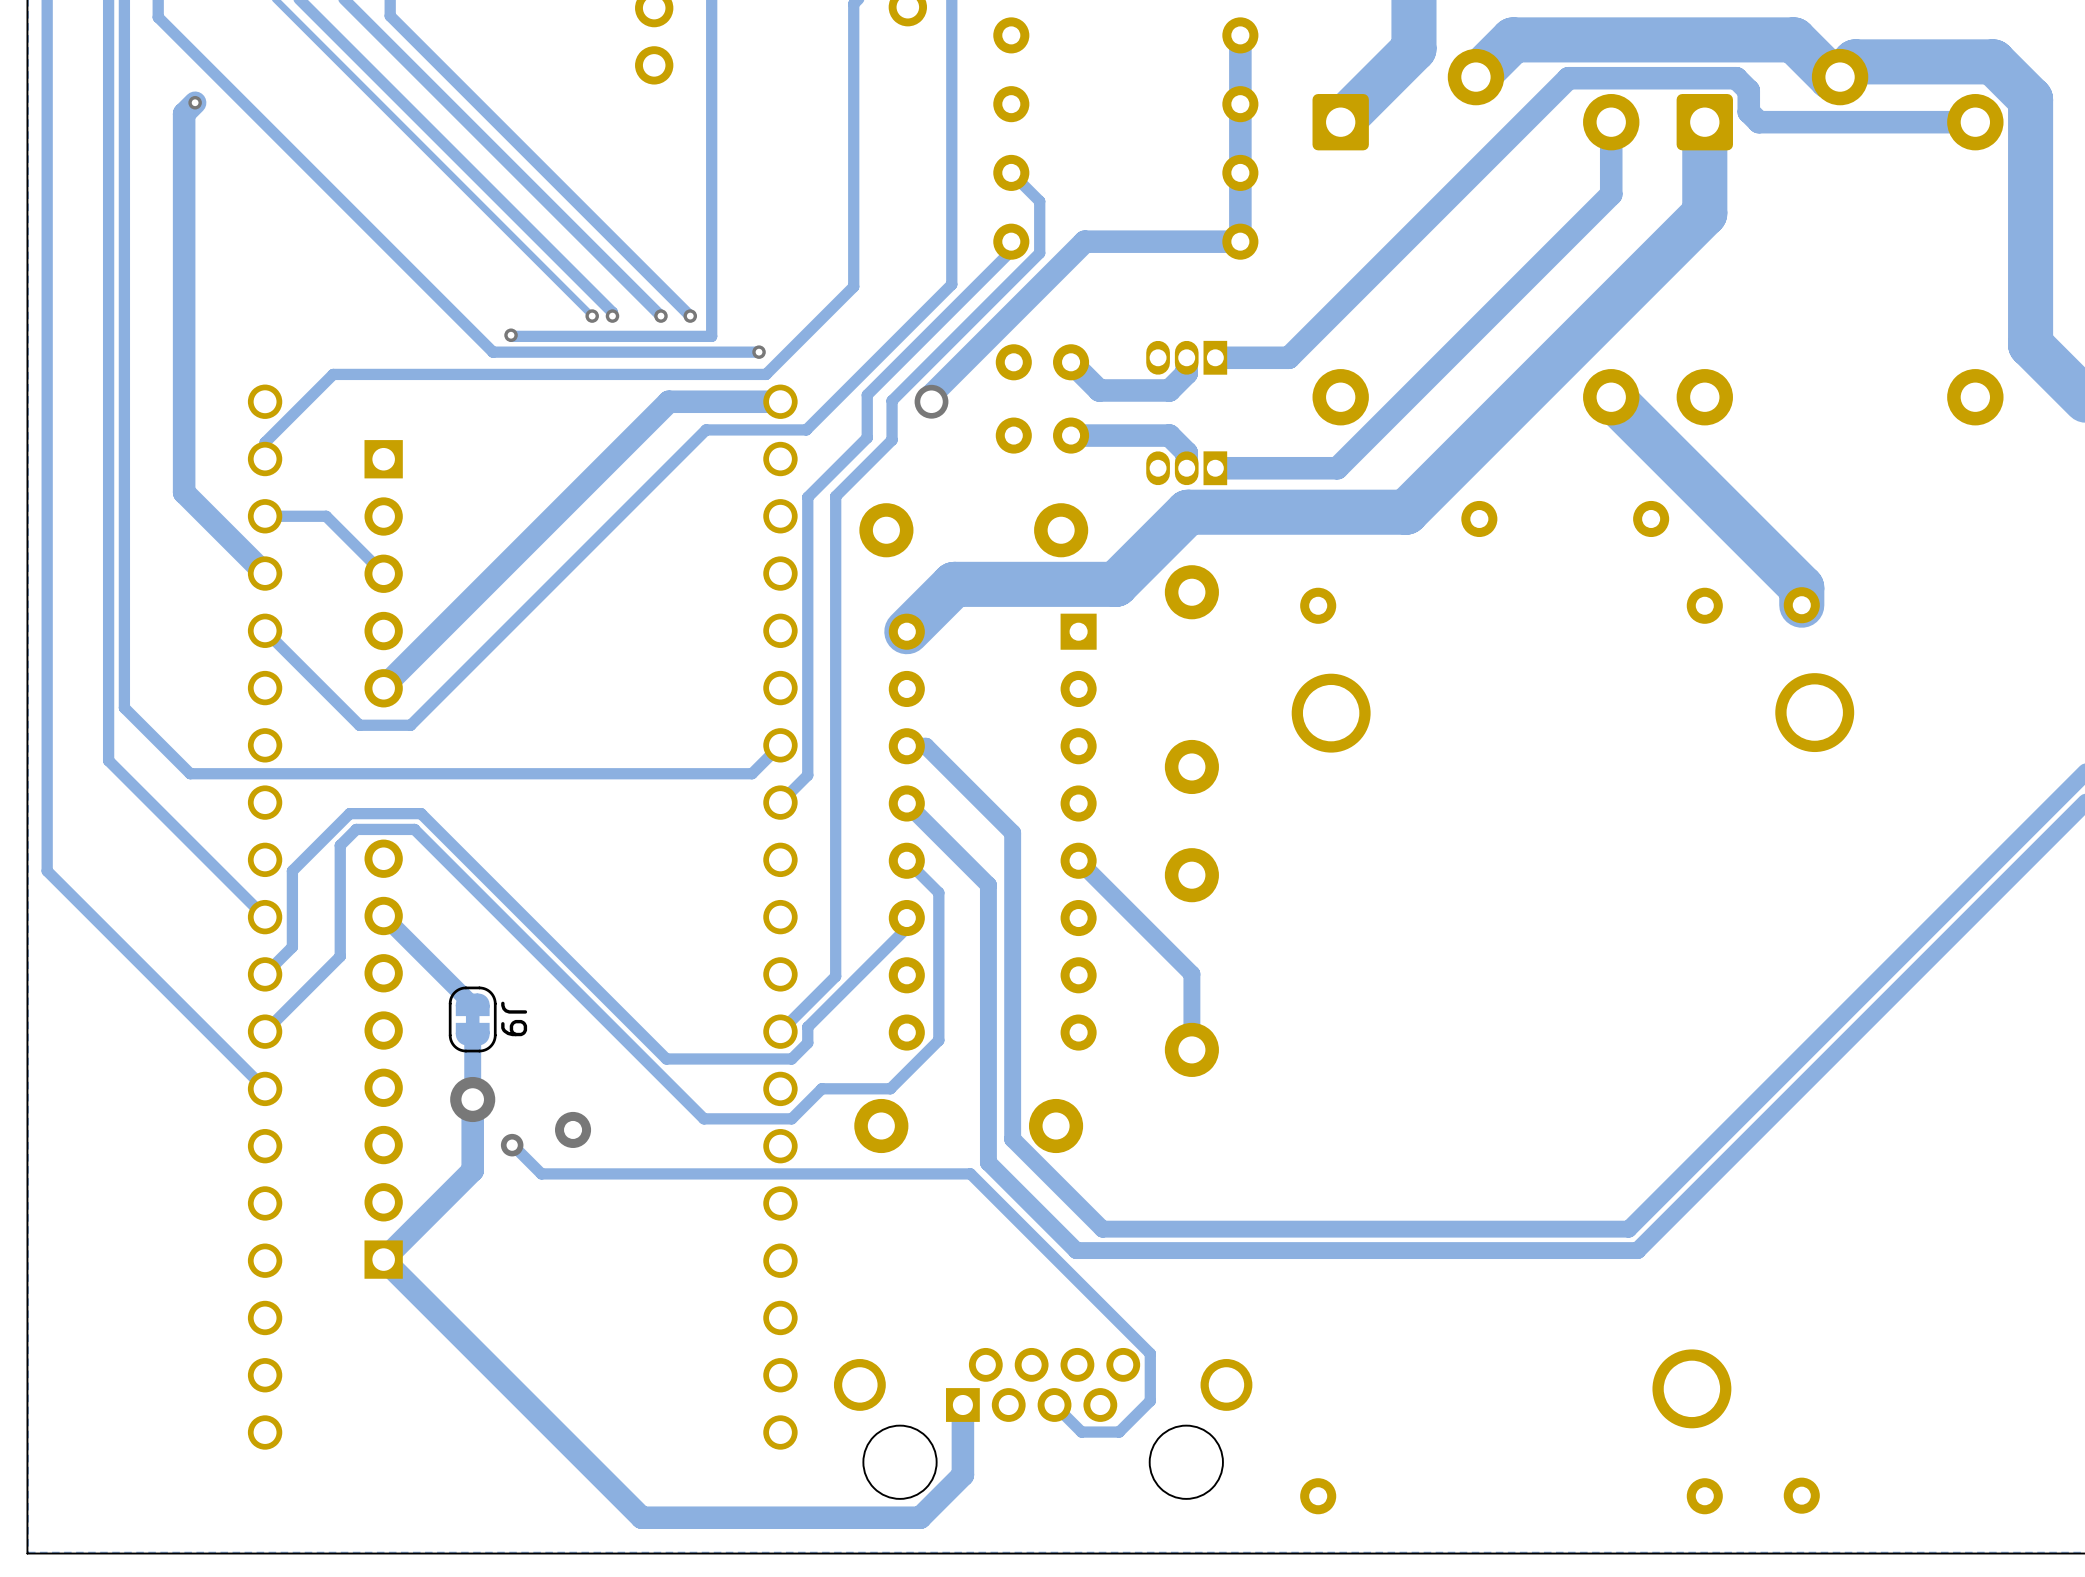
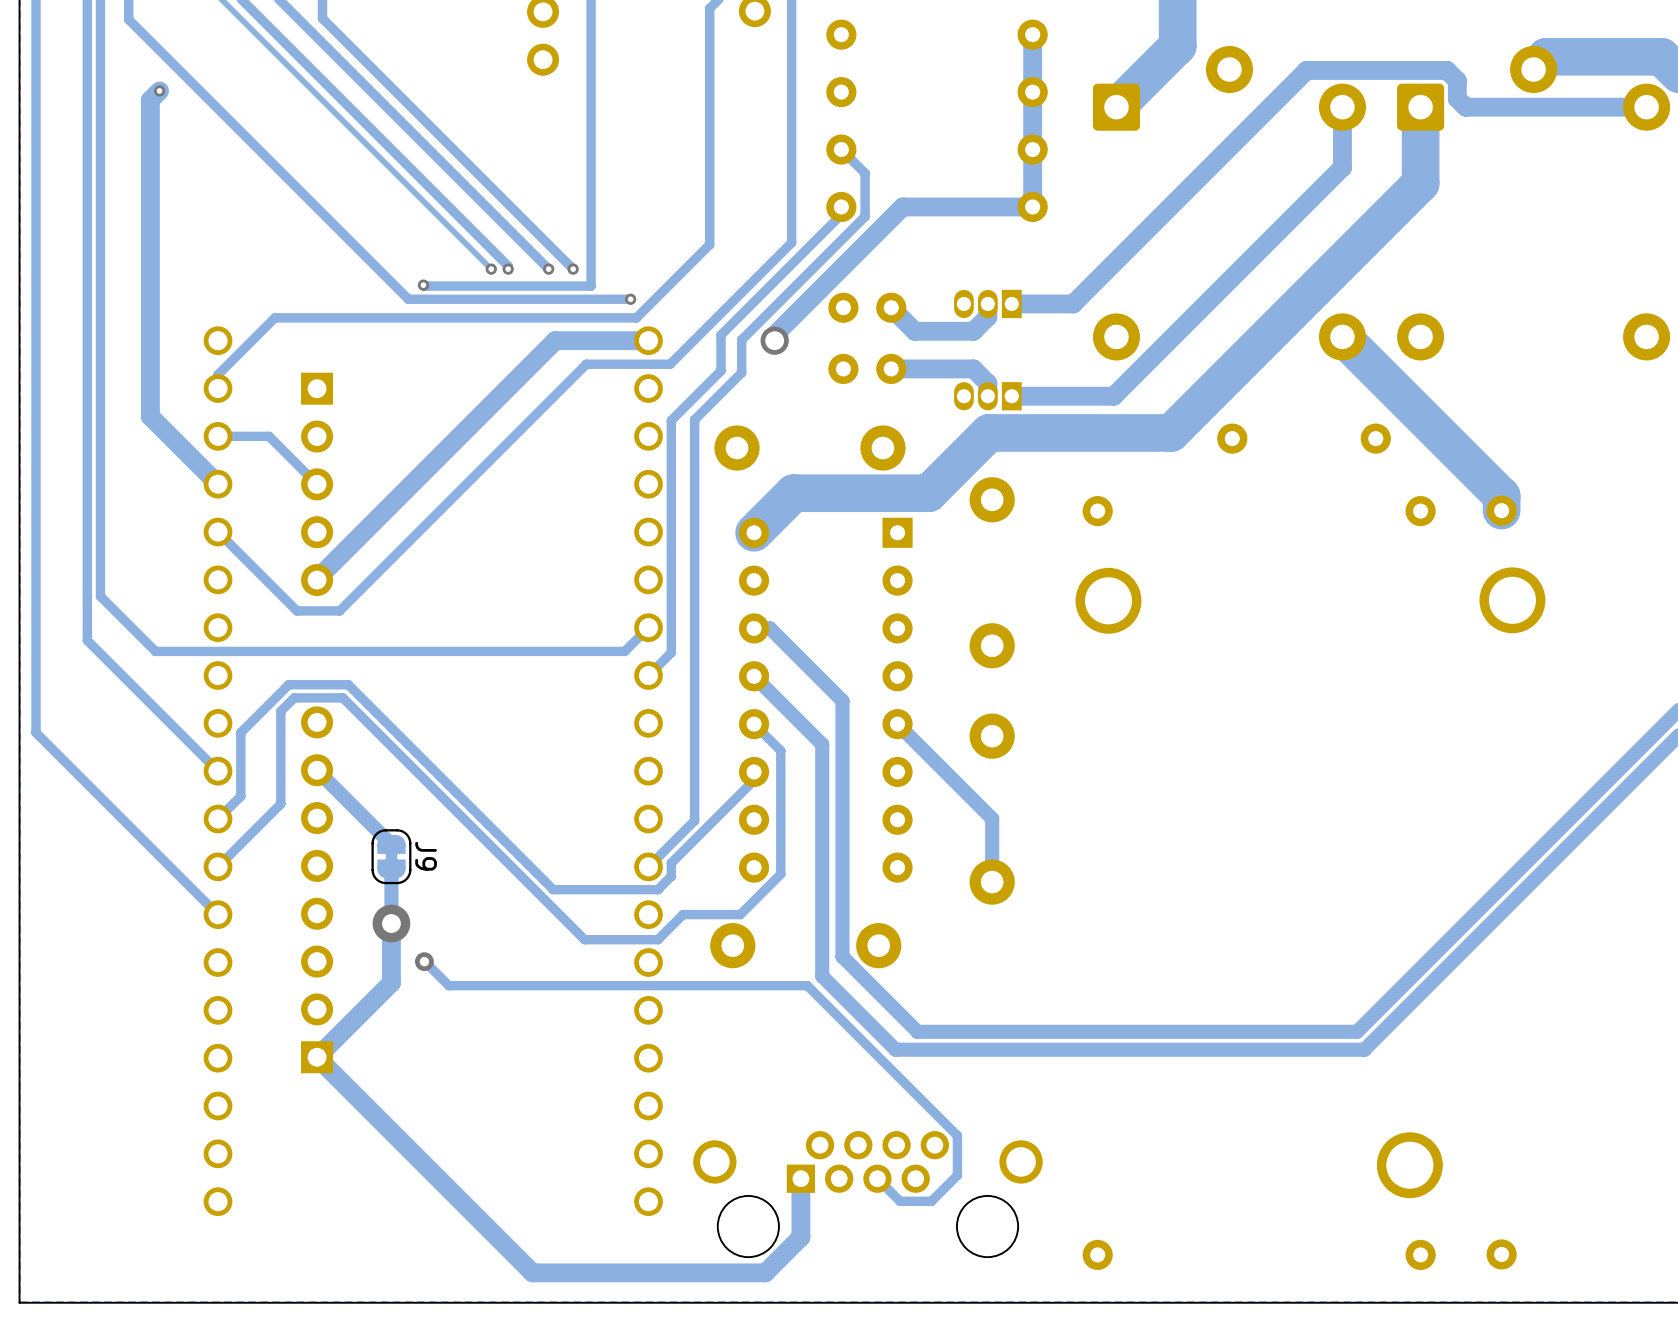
track: (1840, 77) (1831, 77) (1793, 39) (1513, 39) (1475, 77) -> none
via: (573, 1129) -> none

